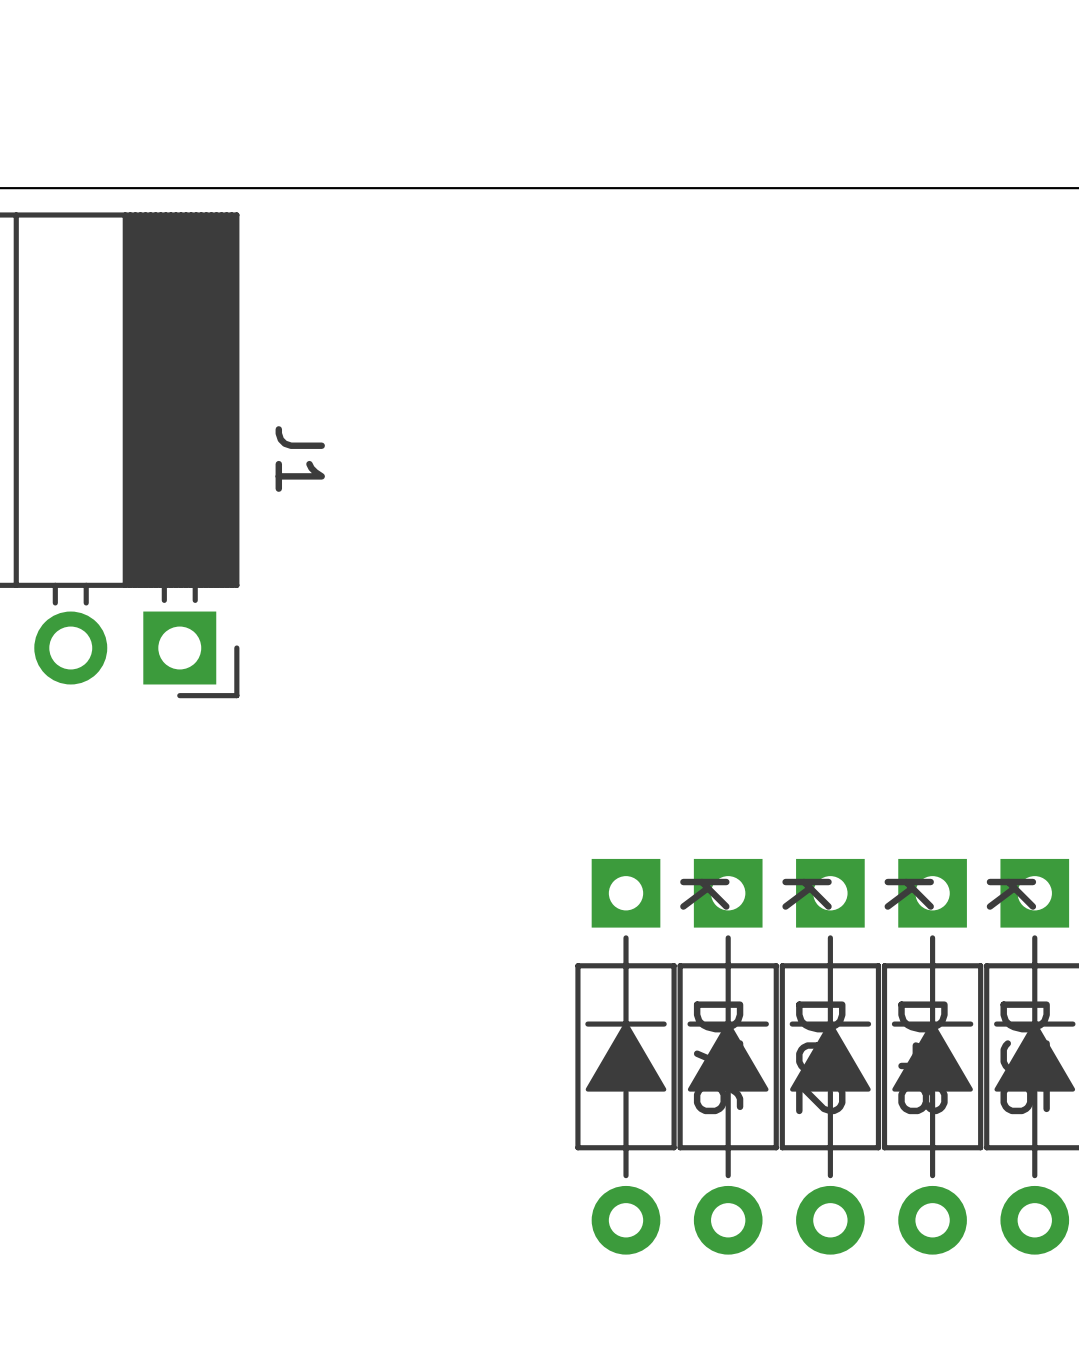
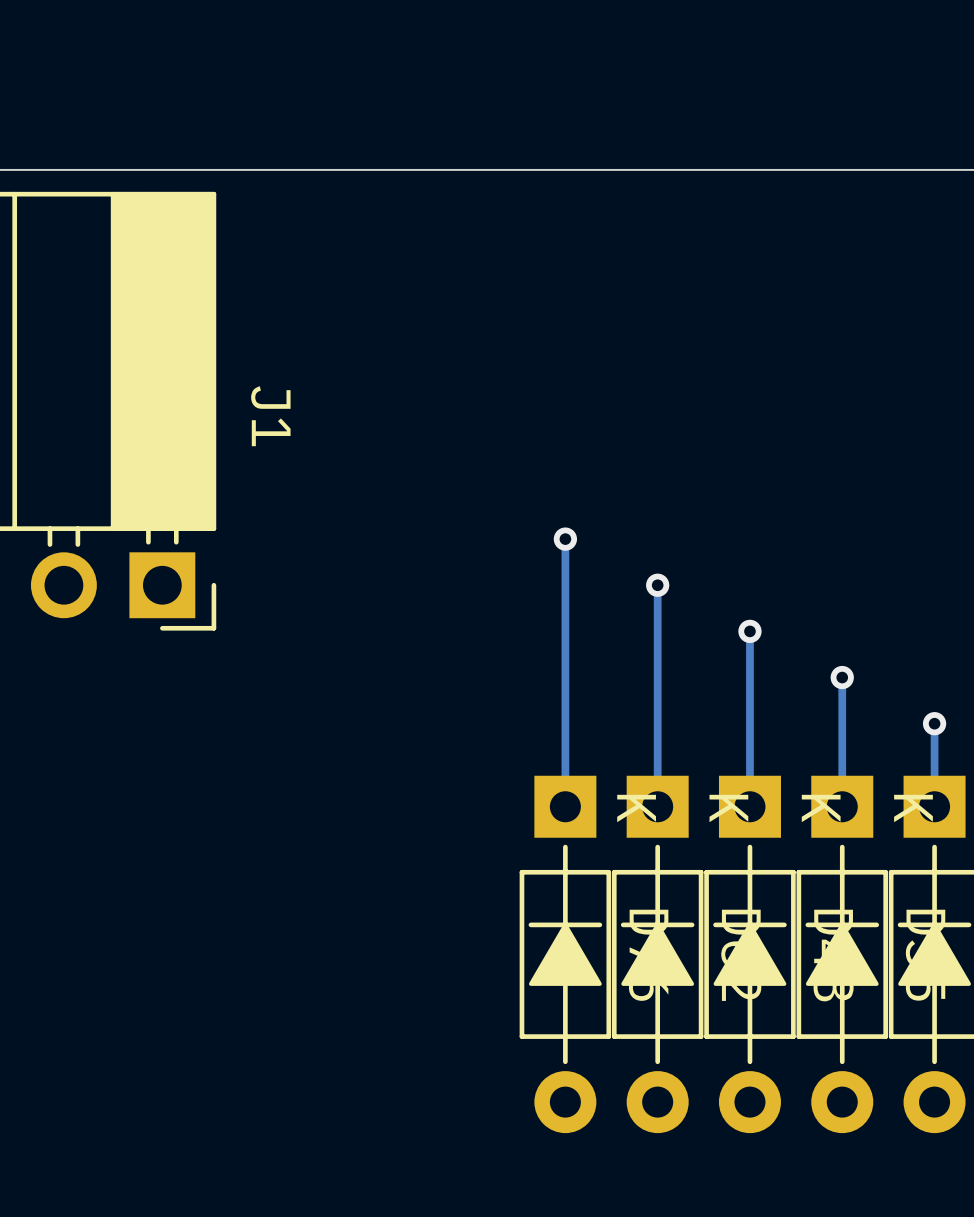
track: none -> (565, 539) (565, 806)
via: none -> (565, 539)
track: none -> (657, 585) (657, 806)
via: none -> (657, 585)
track: none -> (749, 631) (749, 806)
via: none -> (749, 631)
track: none -> (842, 677) (842, 806)
via: none -> (842, 677)
track: none -> (934, 723) (934, 806)
via: none -> (934, 723)

